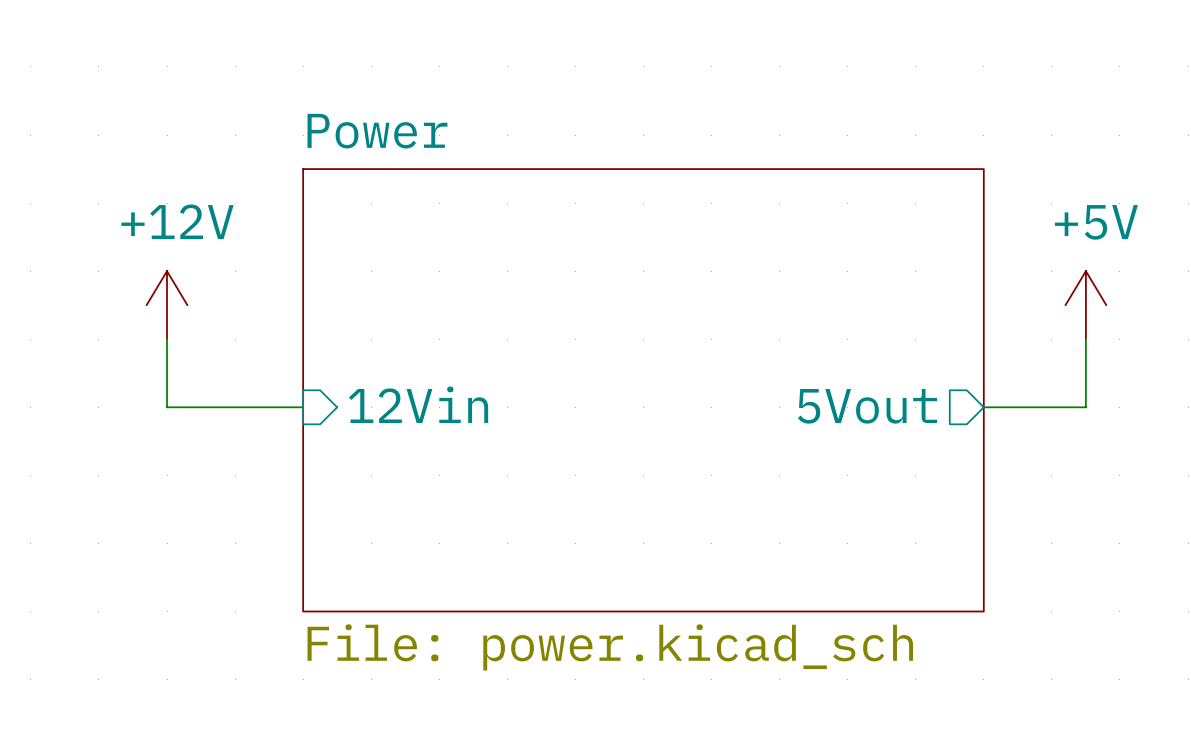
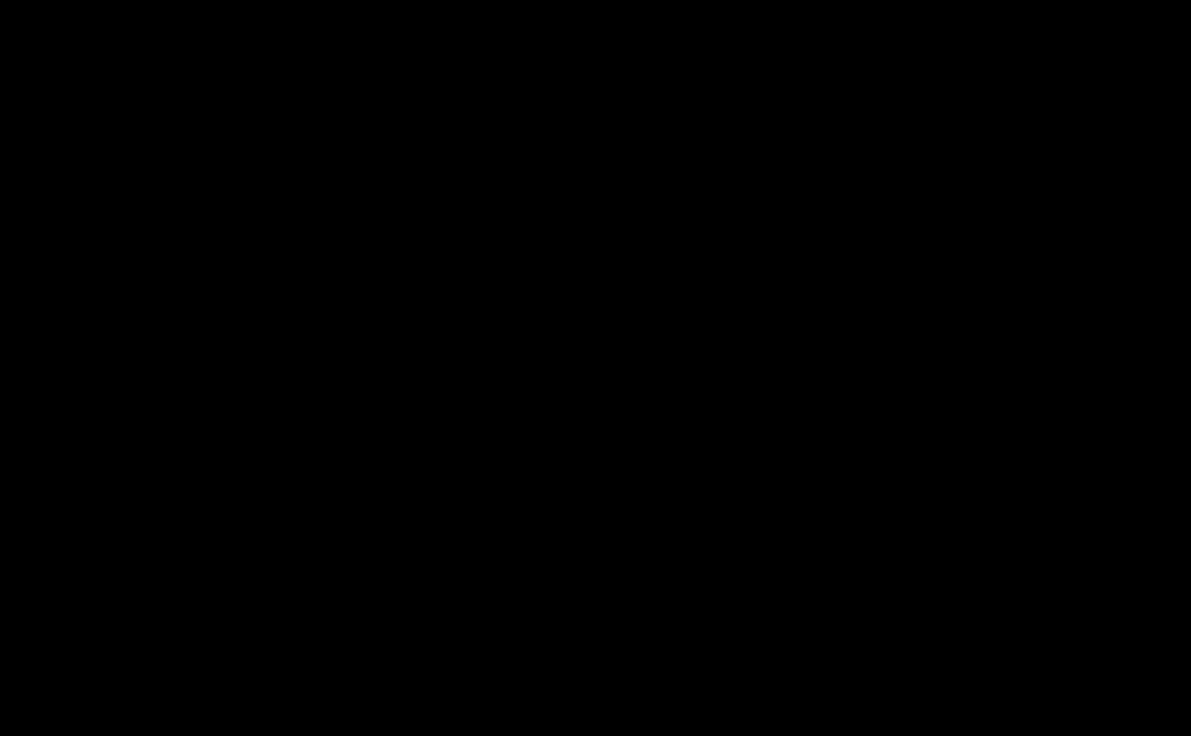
power symbol: +12V (167, 305) -> none
power symbol: +5V (1085, 305) -> none
wire: (167, 339) (167, 407) (303, 407) -> none
wire: (1085, 339) (1085, 407) (983, 407) -> none
sheet Power: File: power.kicad_sch (643, 390) -> none
sheet pin: 12Vin (418, 404) -> none
sheet pin: 5Vout (867, 406) -> none

